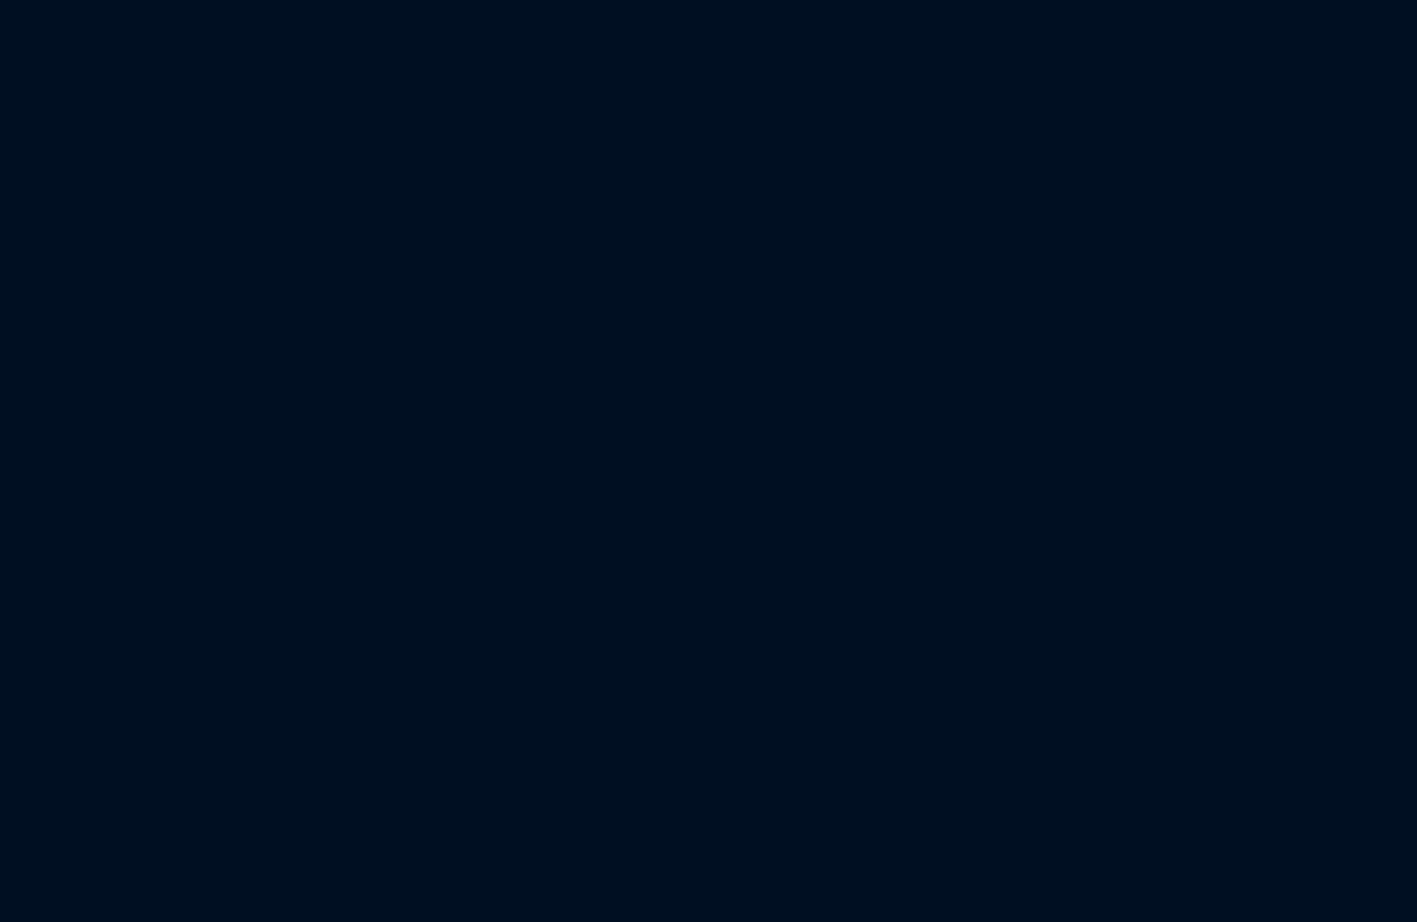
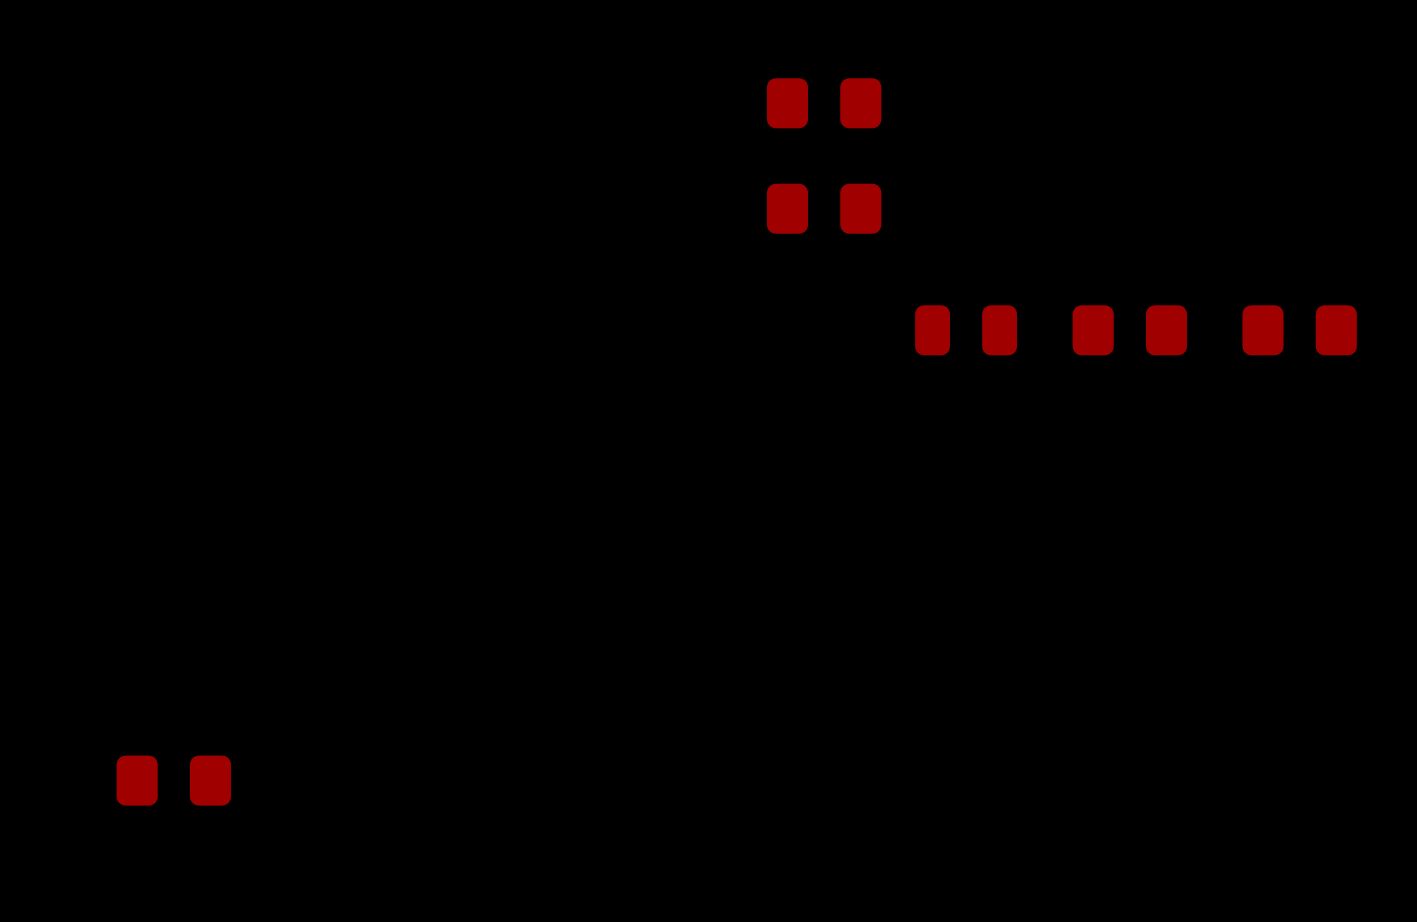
part: none -> (824, 103)
part: none -> (824, 208)
part: none -> (966, 330)
part: none -> (1129, 330)
part: none -> (1299, 330)
part: none -> (173, 780)

